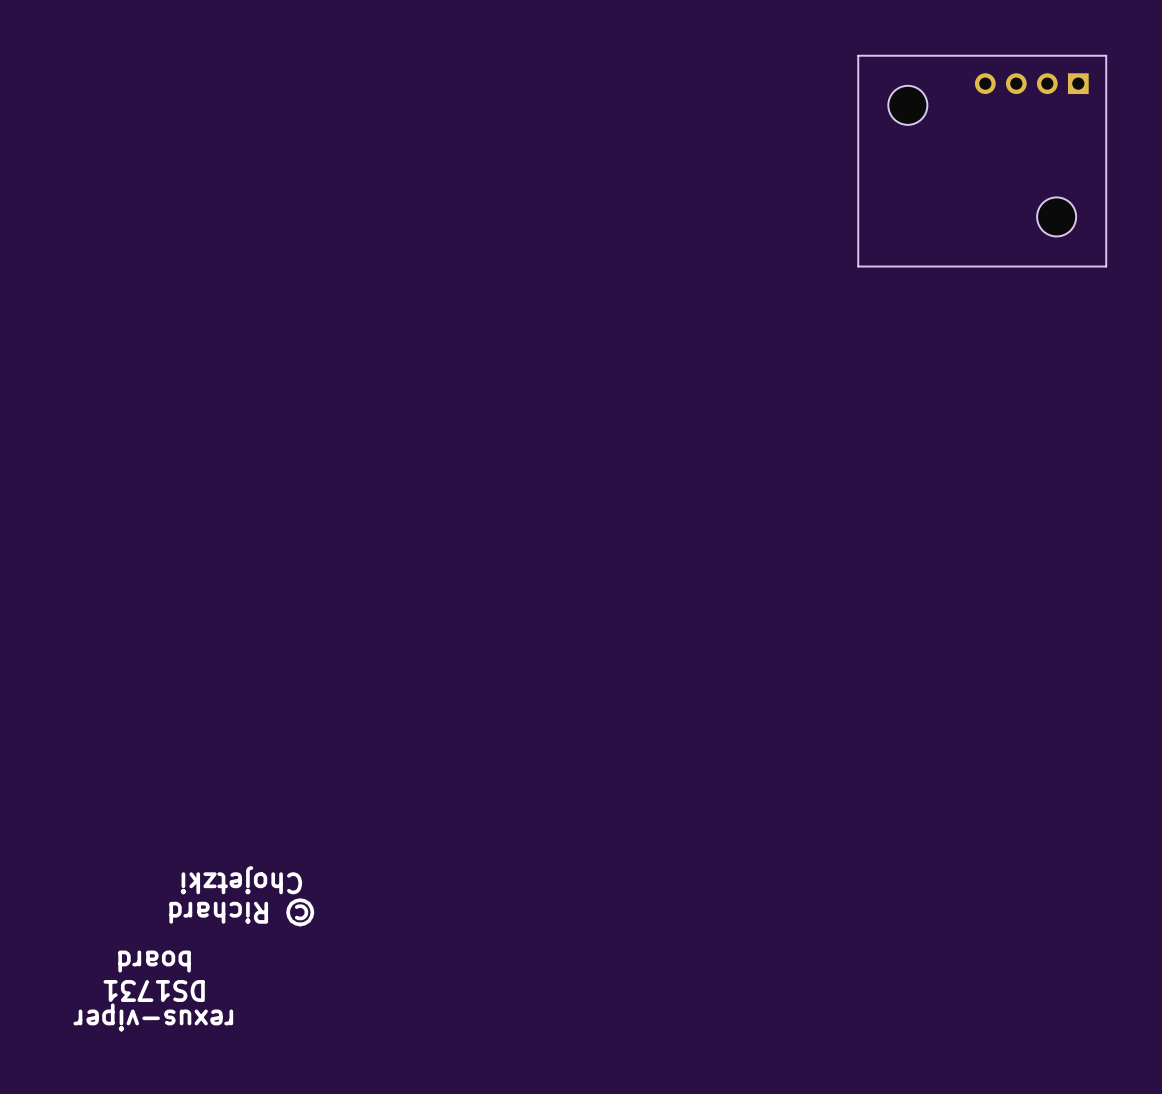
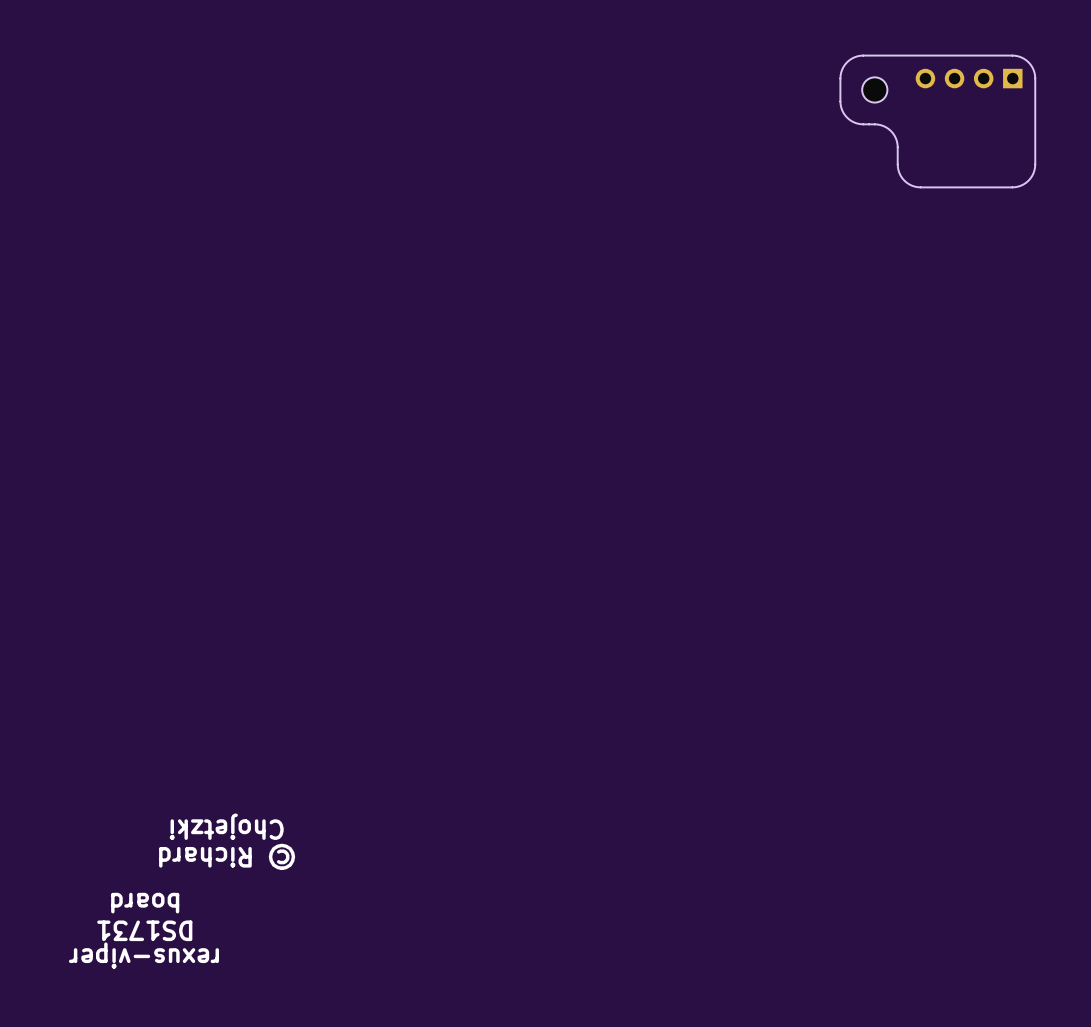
board edge: (1106, 55) (1106, 266) (858, 266) (858, 55) (1106, 55) -> (1012, 55) (1021, 57) (1028, 62) (1033, 69) (1035, 78) (1035, 167) (1030, 178) (1018, 186) (920, 187) (911, 185) (904, 180) (899, 173) (896, 141) (891, 131) (880, 125) (854, 122) (845, 115) (841, 107) (841, 72) (847, 62) (857, 56) (1012, 55)
part: none -> (874, 89)
part: (907, 105) -> none
part: (1056, 216) -> none

